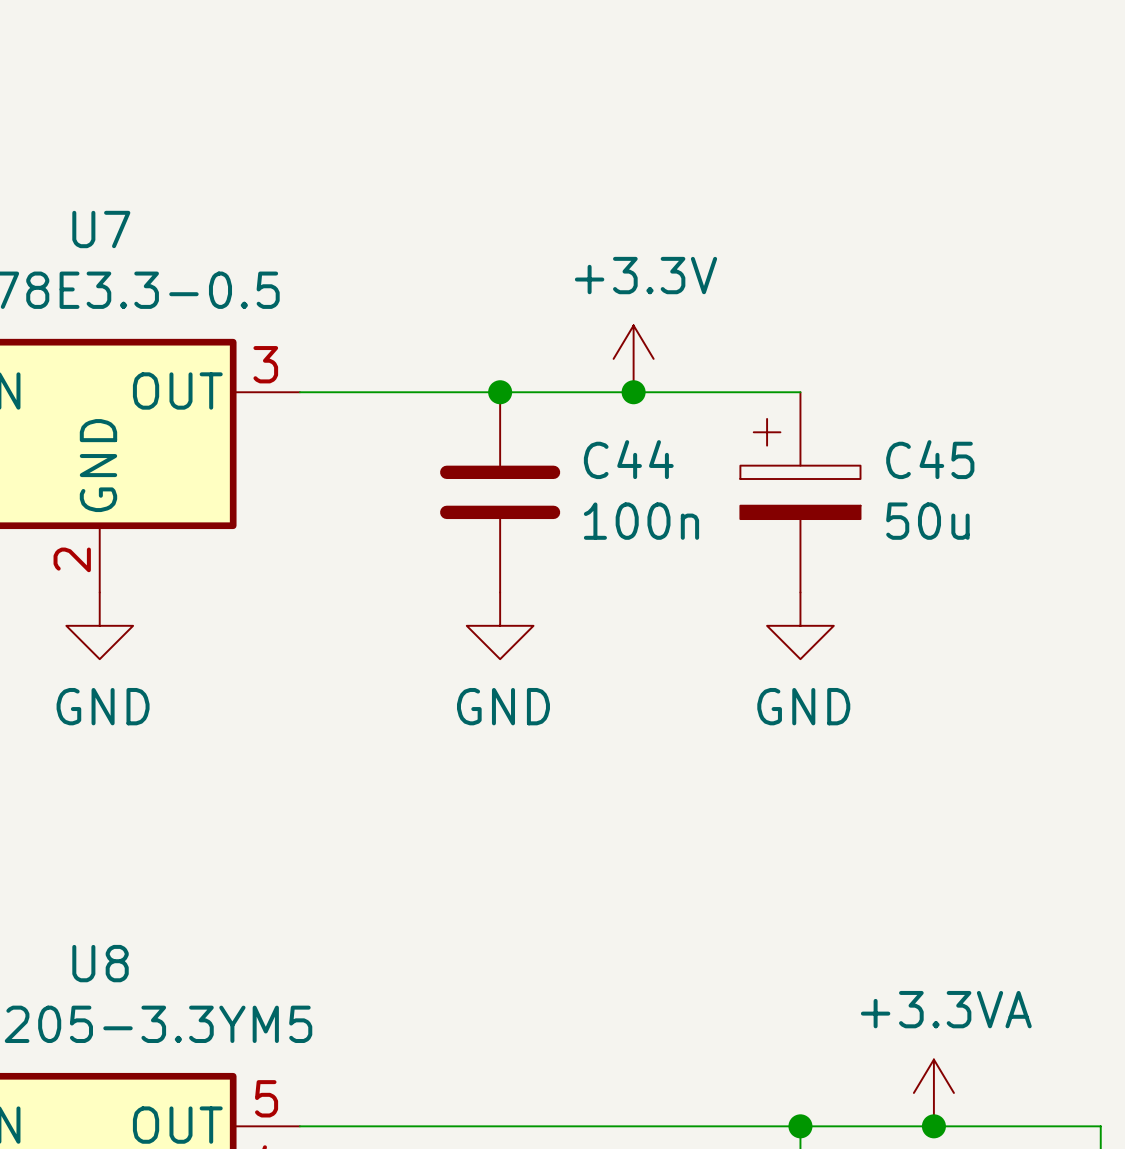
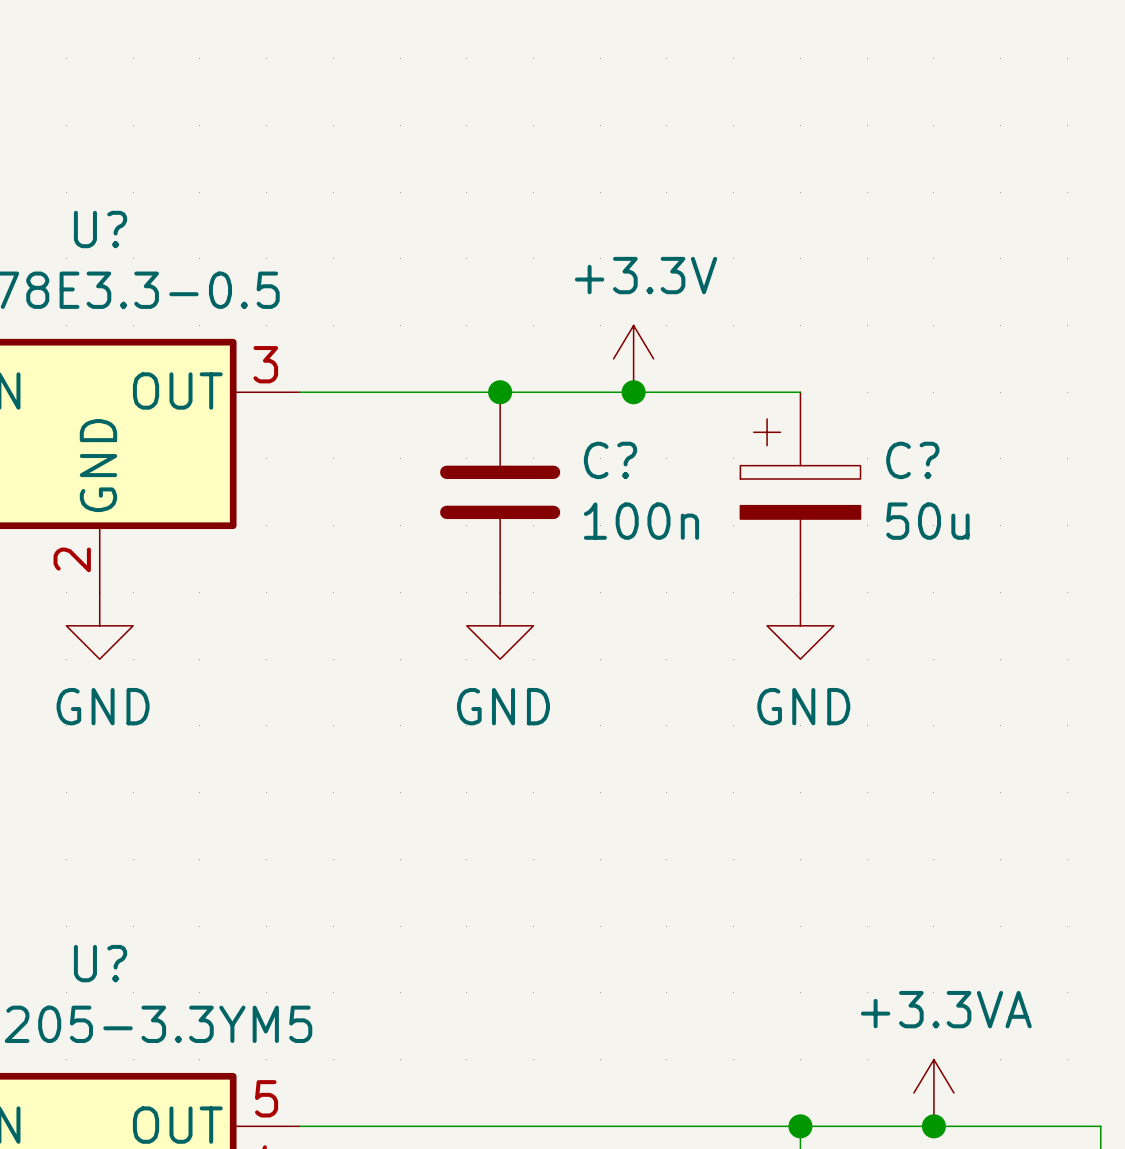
U7 name: U7 (101, 229) -> U? (100, 229)
C44 name: C44 (628, 459) -> C? (610, 460)
C45 name: C45 (930, 459) -> C? (912, 460)
U8 name: U8 (100, 963) -> U? (100, 963)

